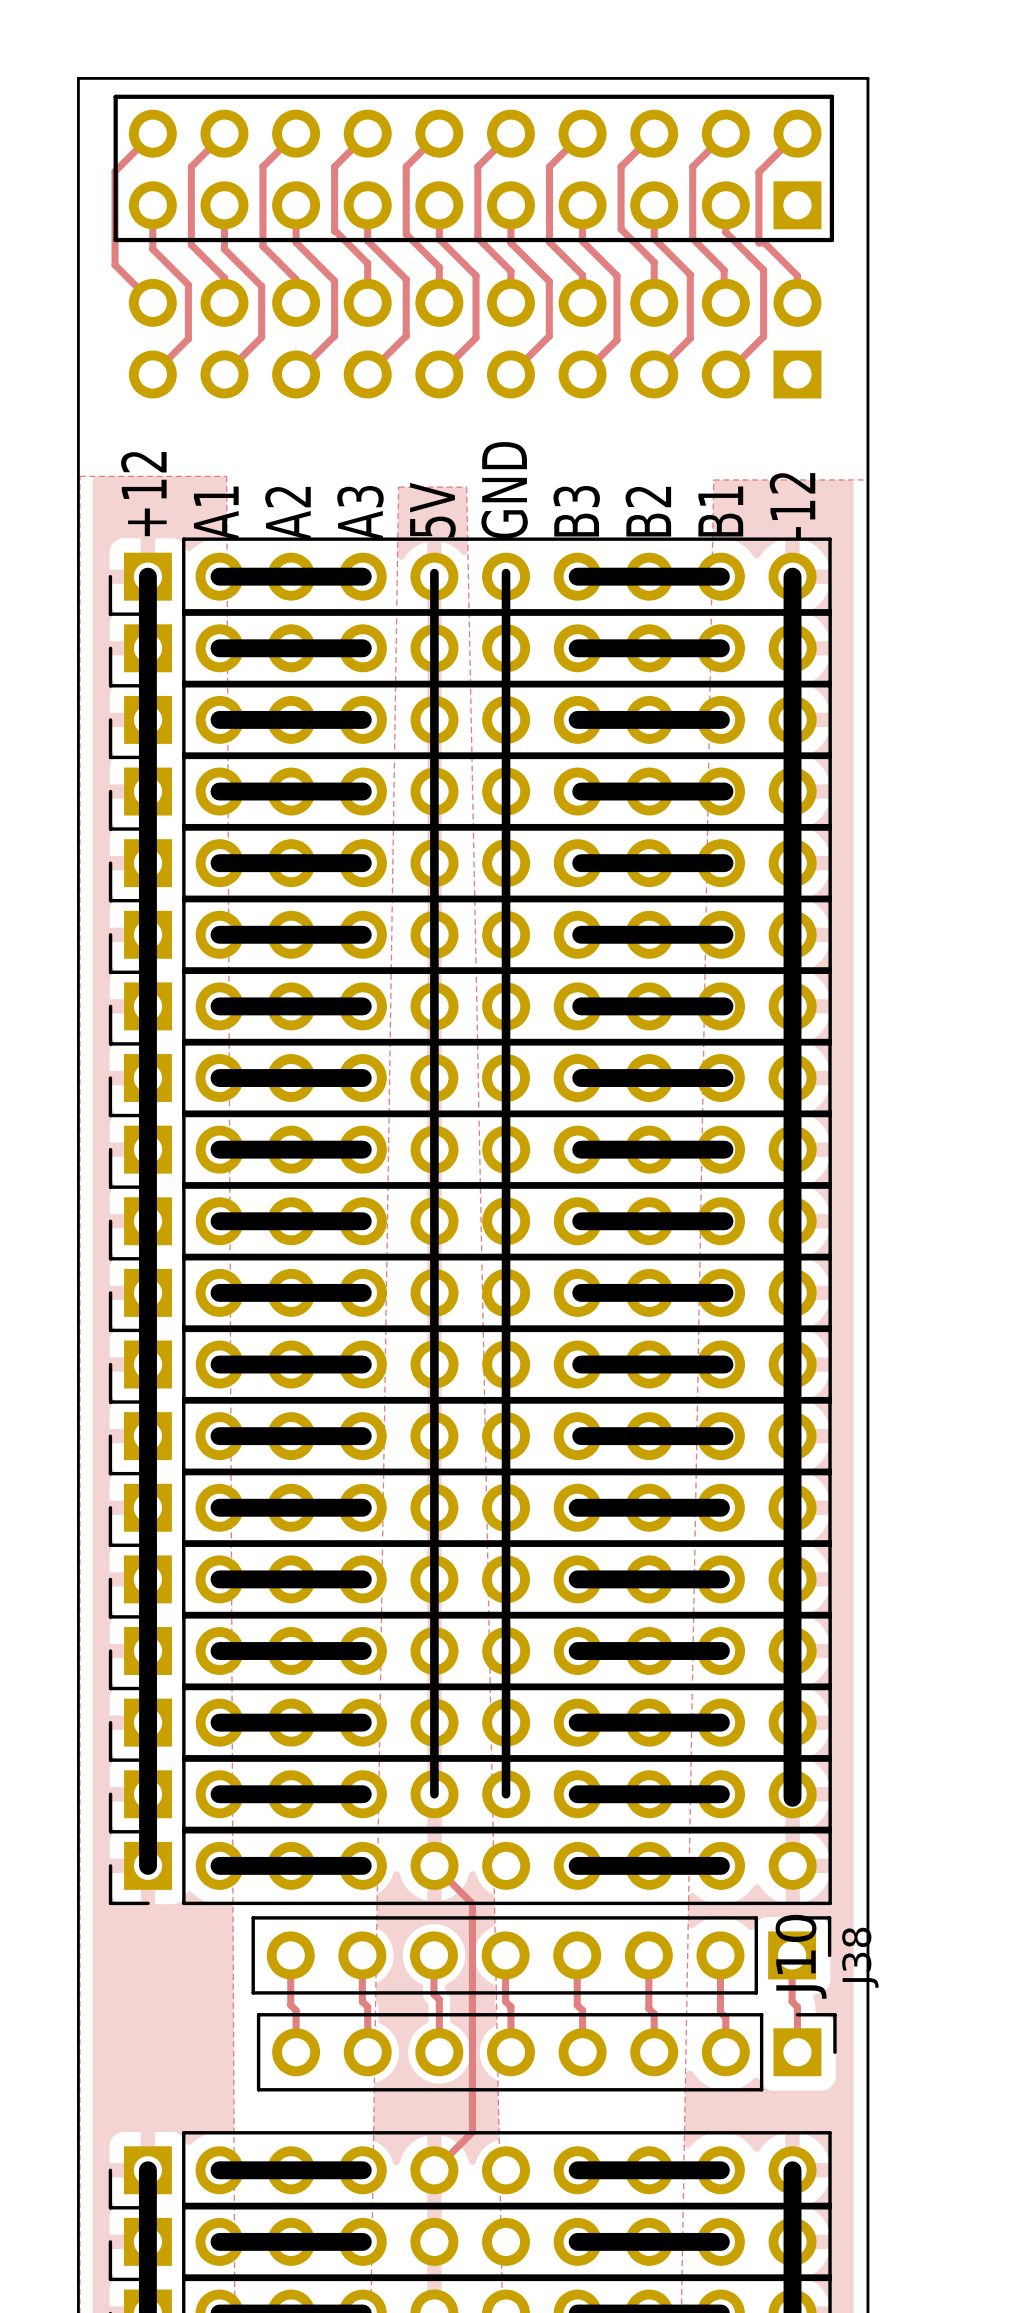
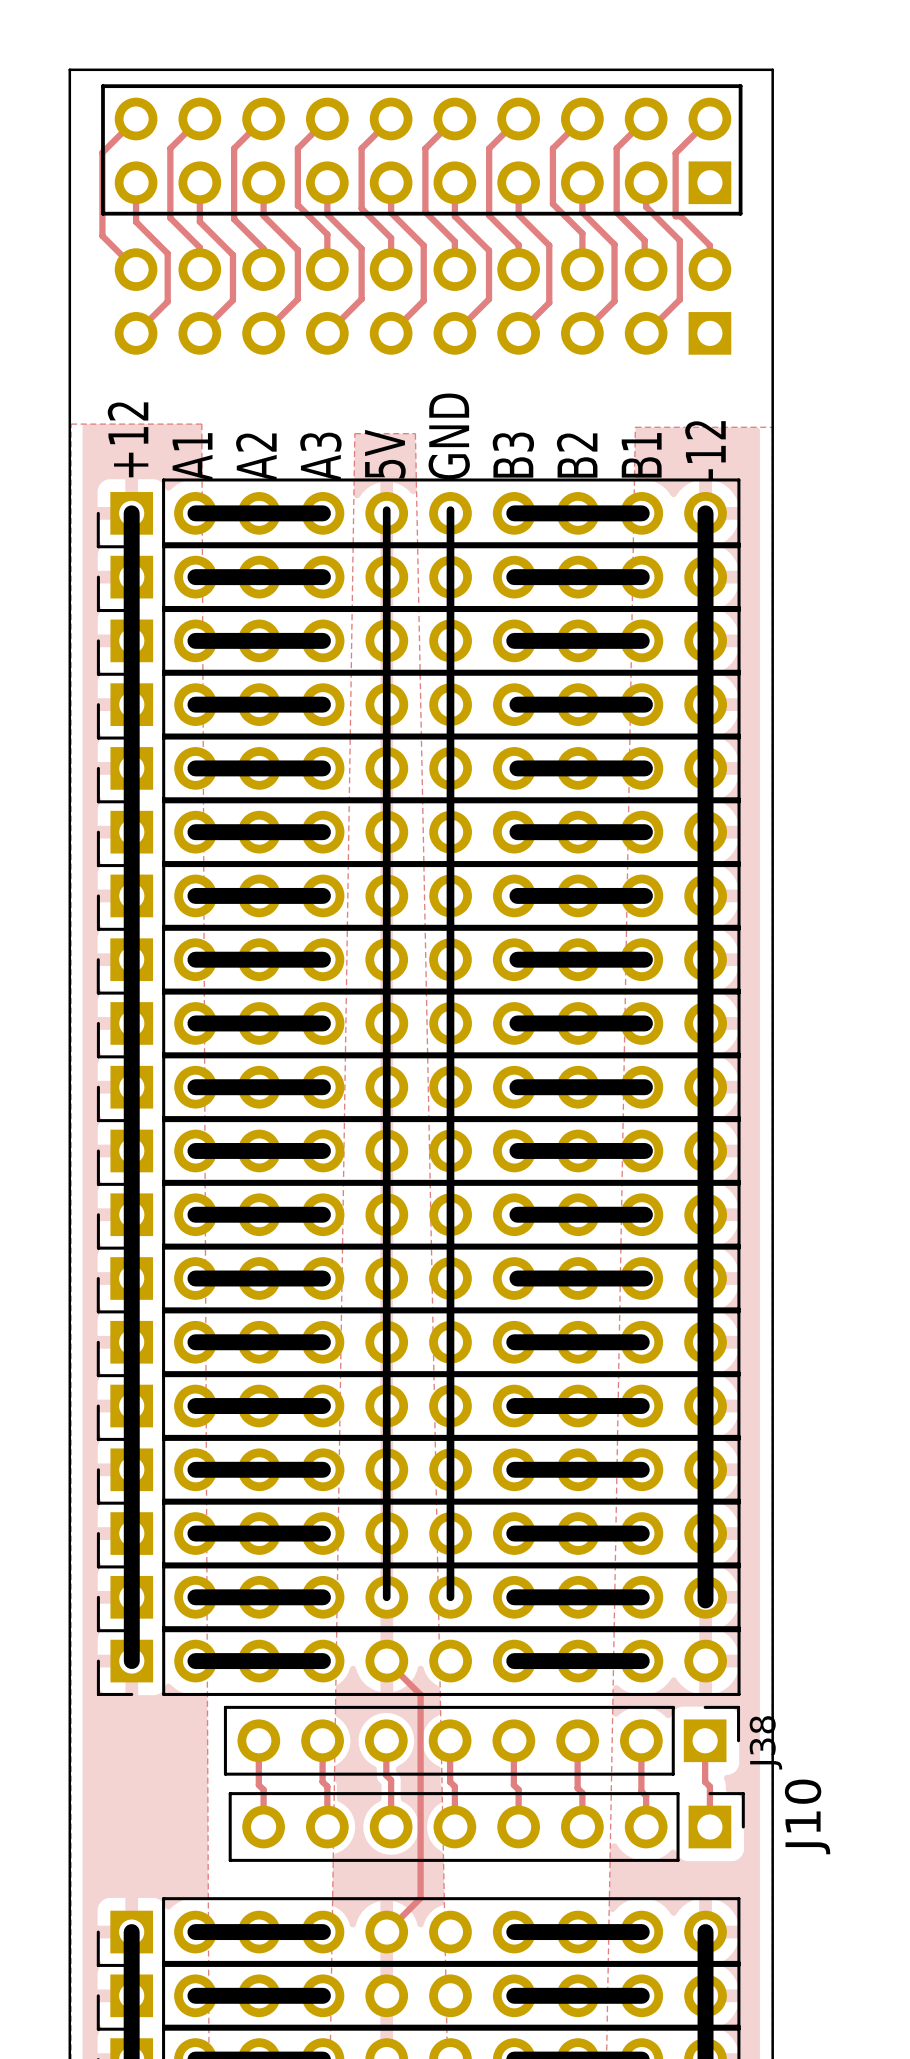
J10 name position: J10 (801, 1956) -> J10 (807, 1816)

